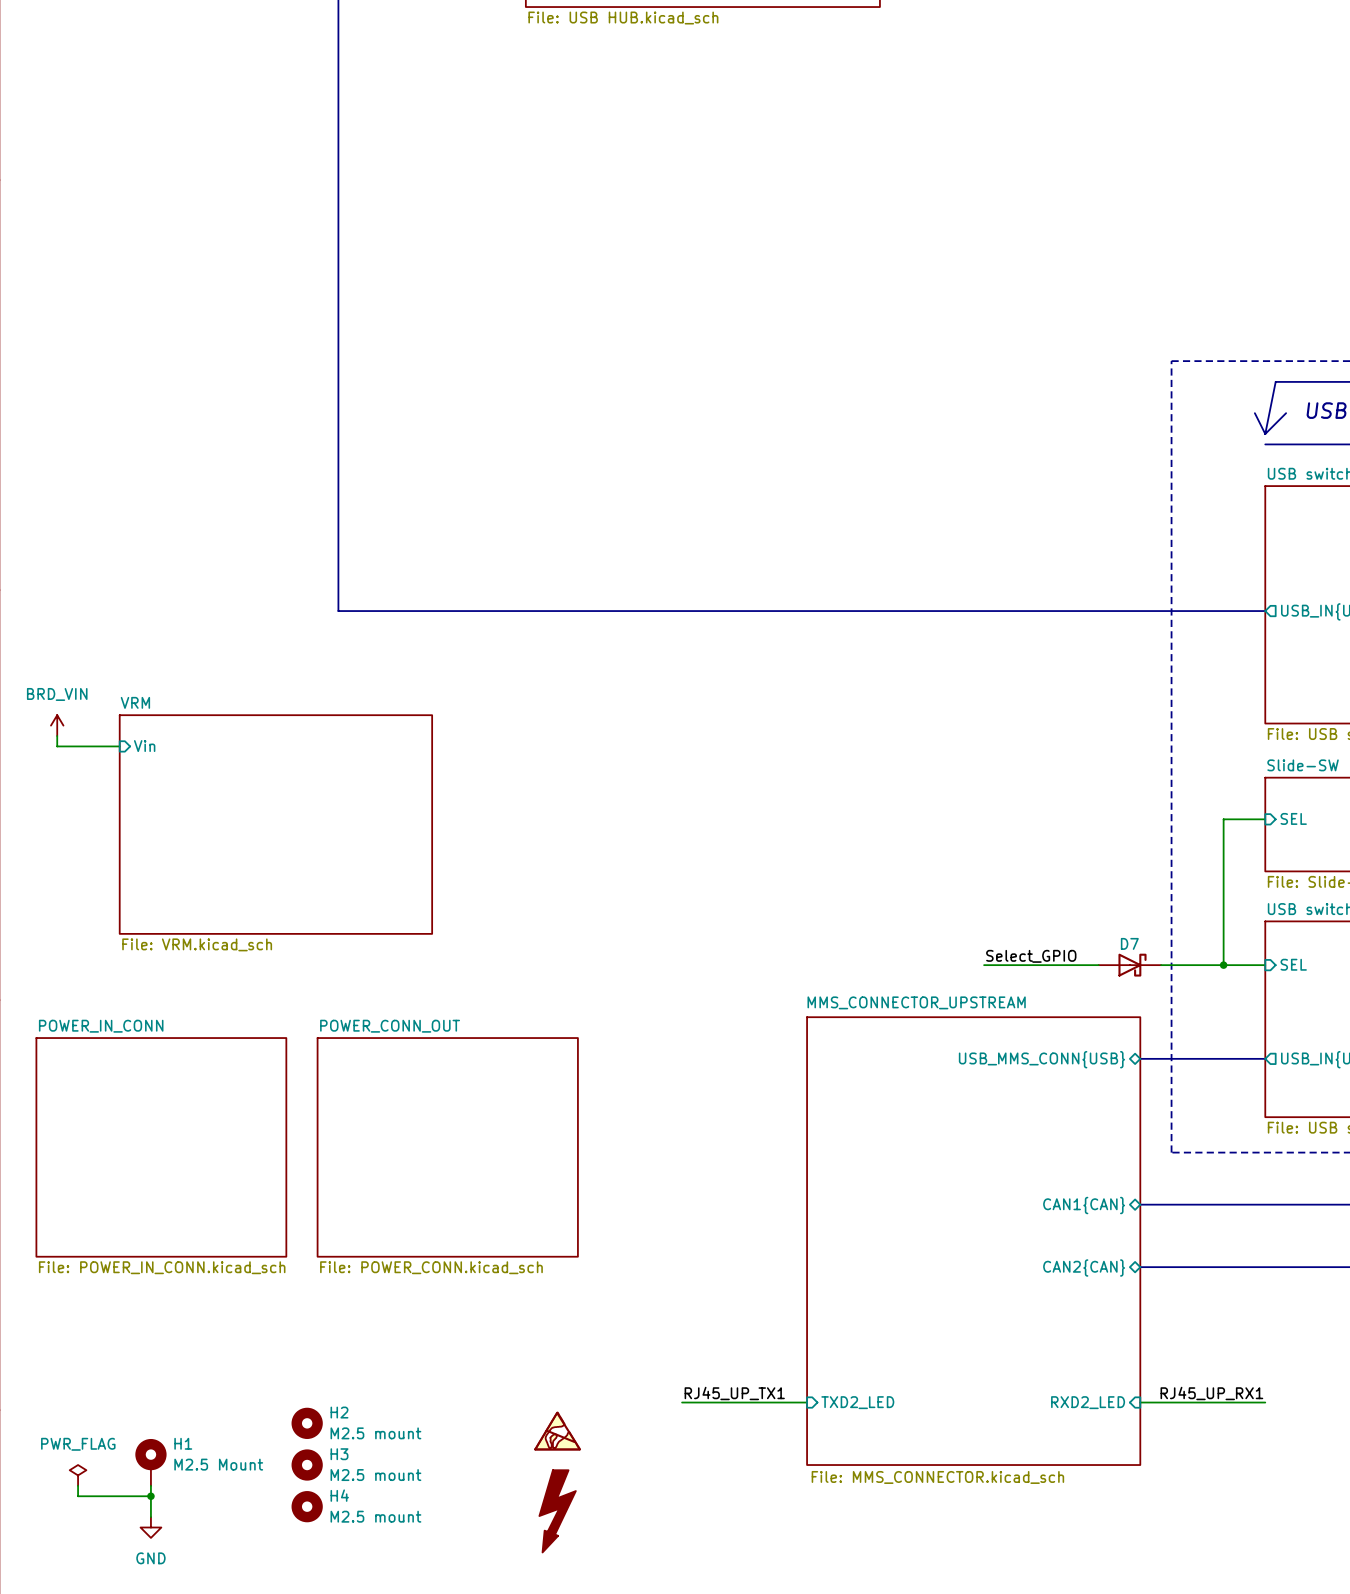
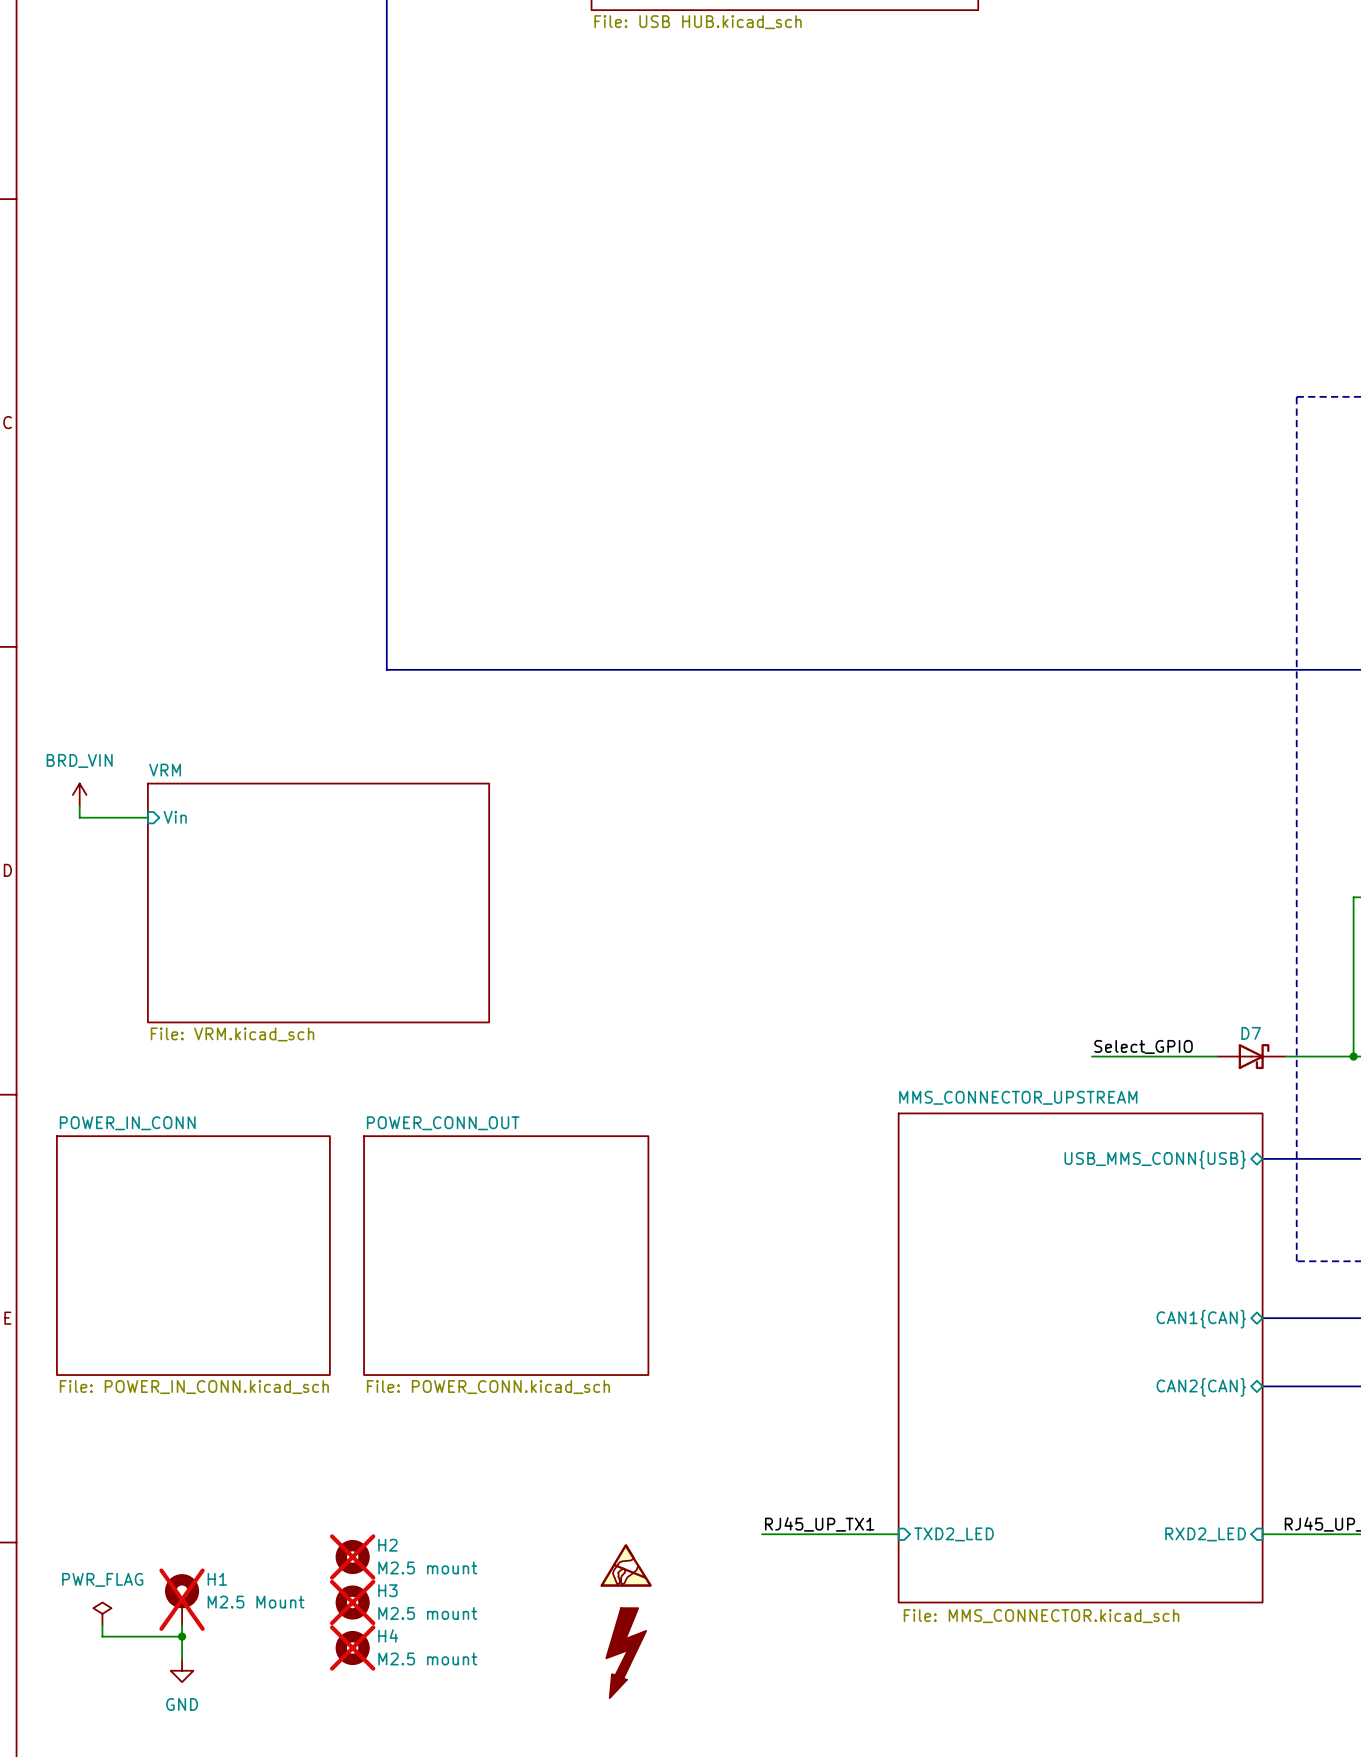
H2 do-not-place cross: none -> (352, 1557)
H1 do-not-place cross: none -> (182, 1599)
H3 do-not-place cross: none -> (352, 1602)
H4 do-not-place cross: none -> (352, 1648)

